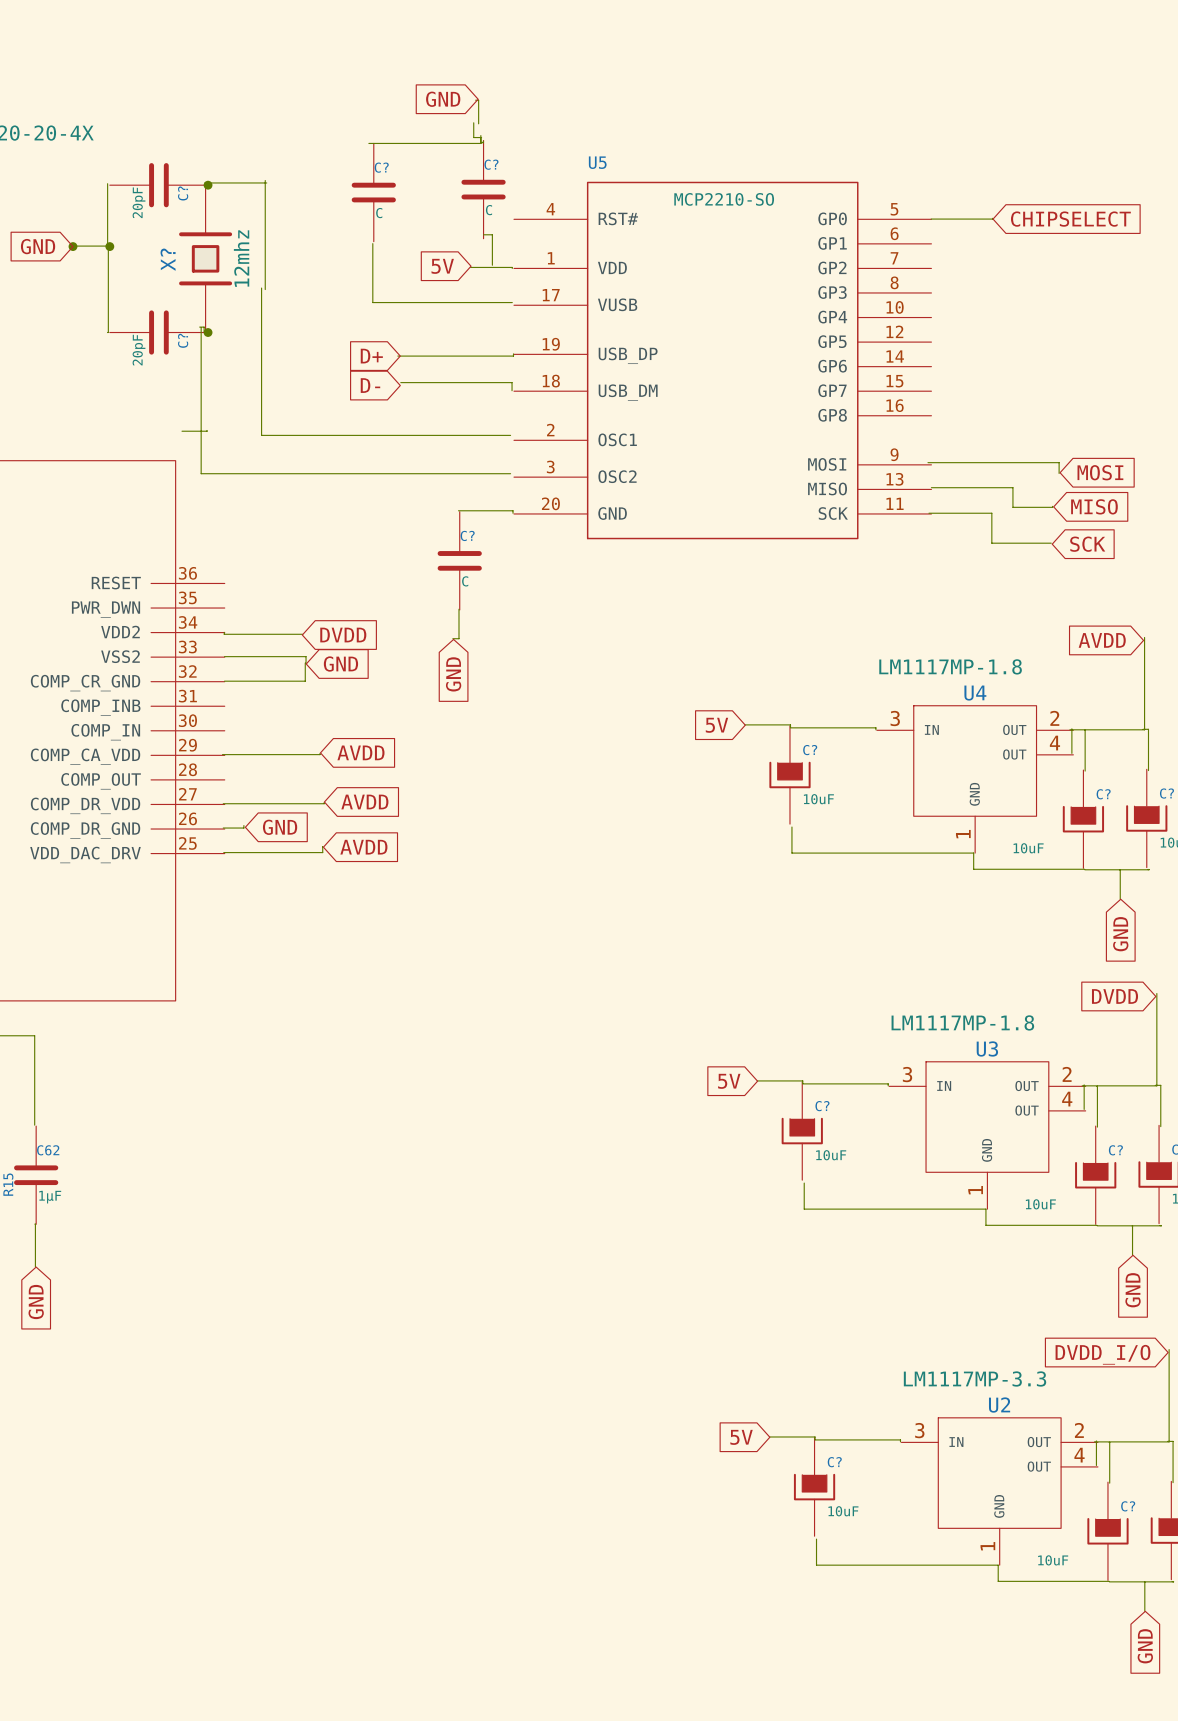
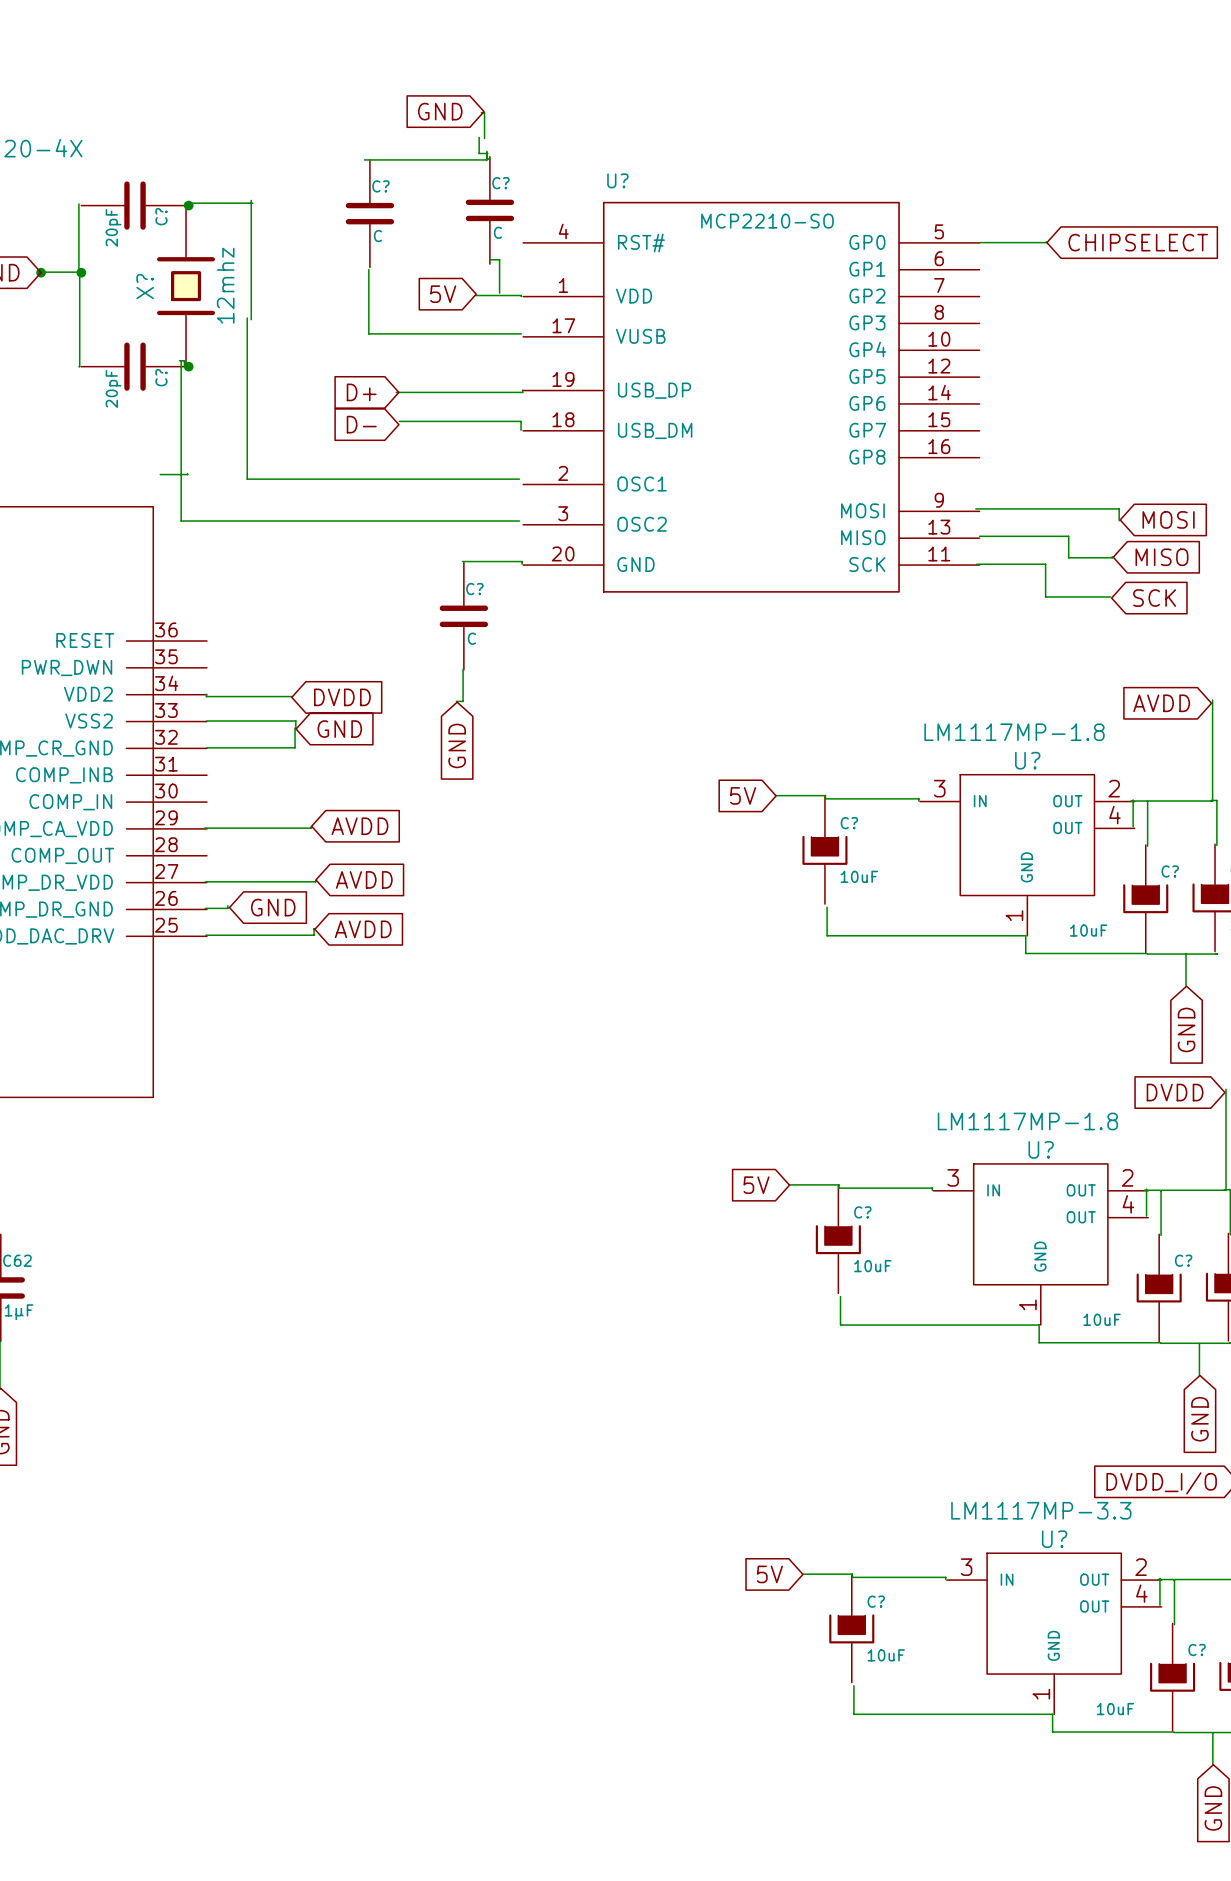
U5 name: U5 (597, 162) -> U? (617, 180)
U4 name: U4 (975, 693) -> U? (1027, 760)
U3 name: U3 (987, 1048) -> U? (1041, 1149)
U2 name: U2 (999, 1405) -> U? (1054, 1539)

